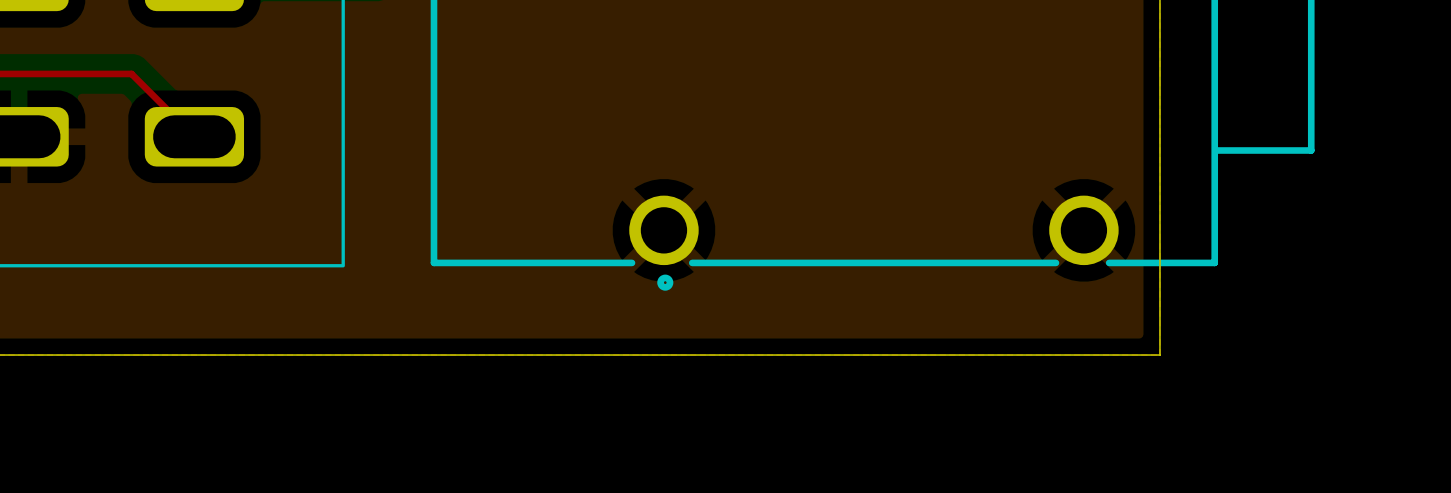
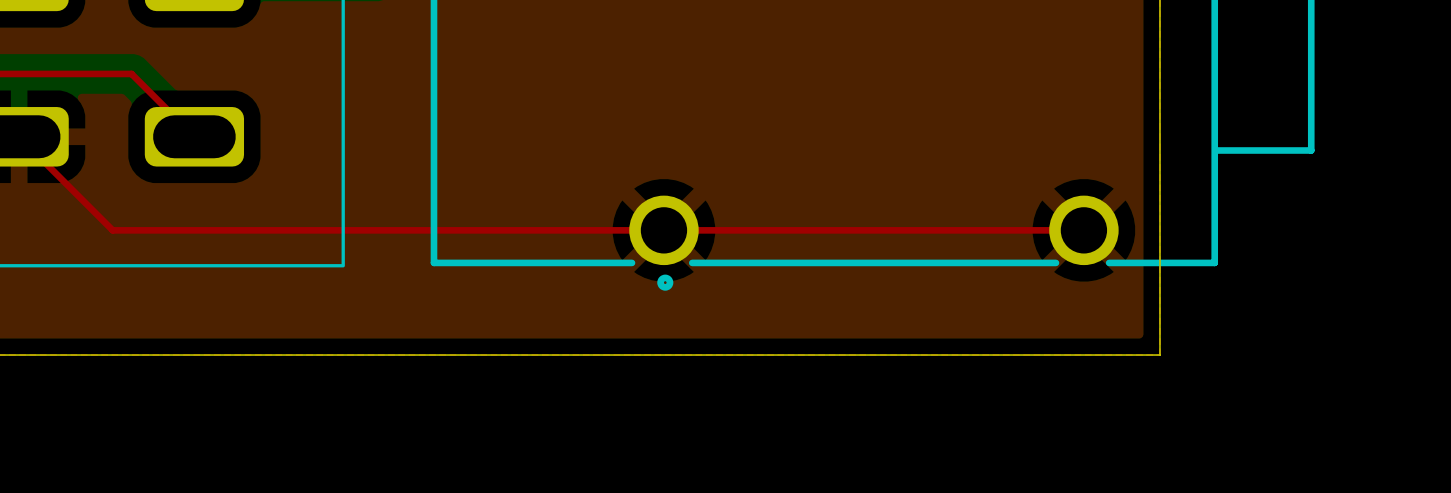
top track: none -> (19, 136) (112, 230) (1083, 230)

